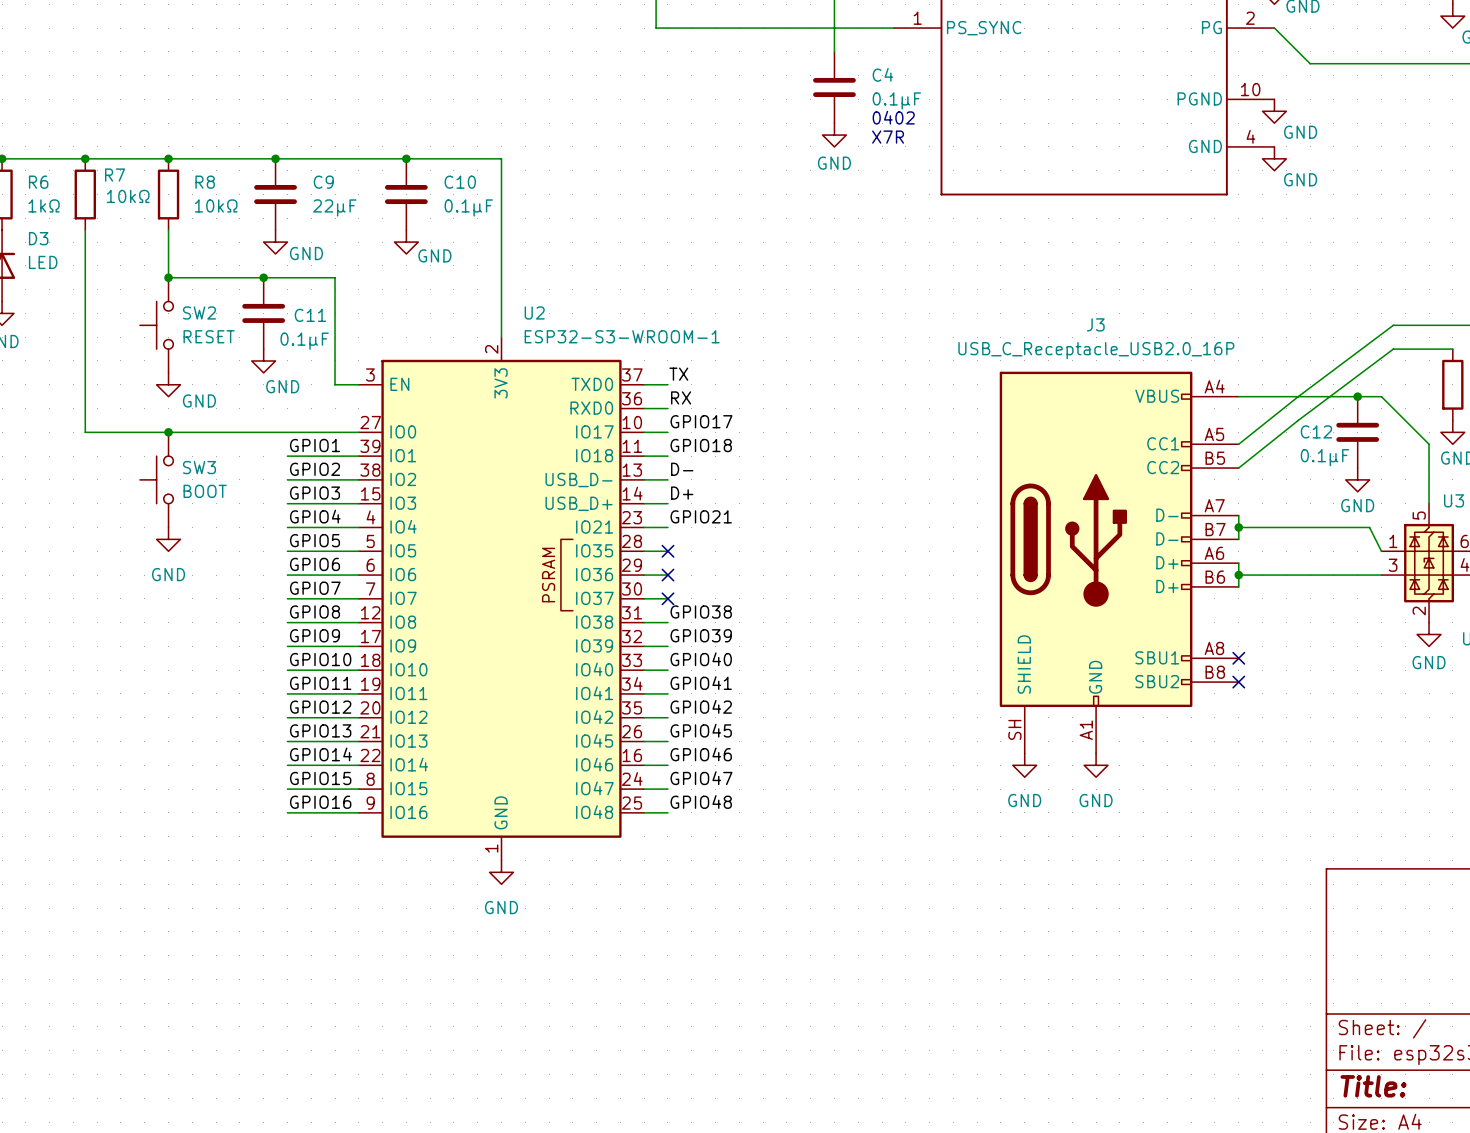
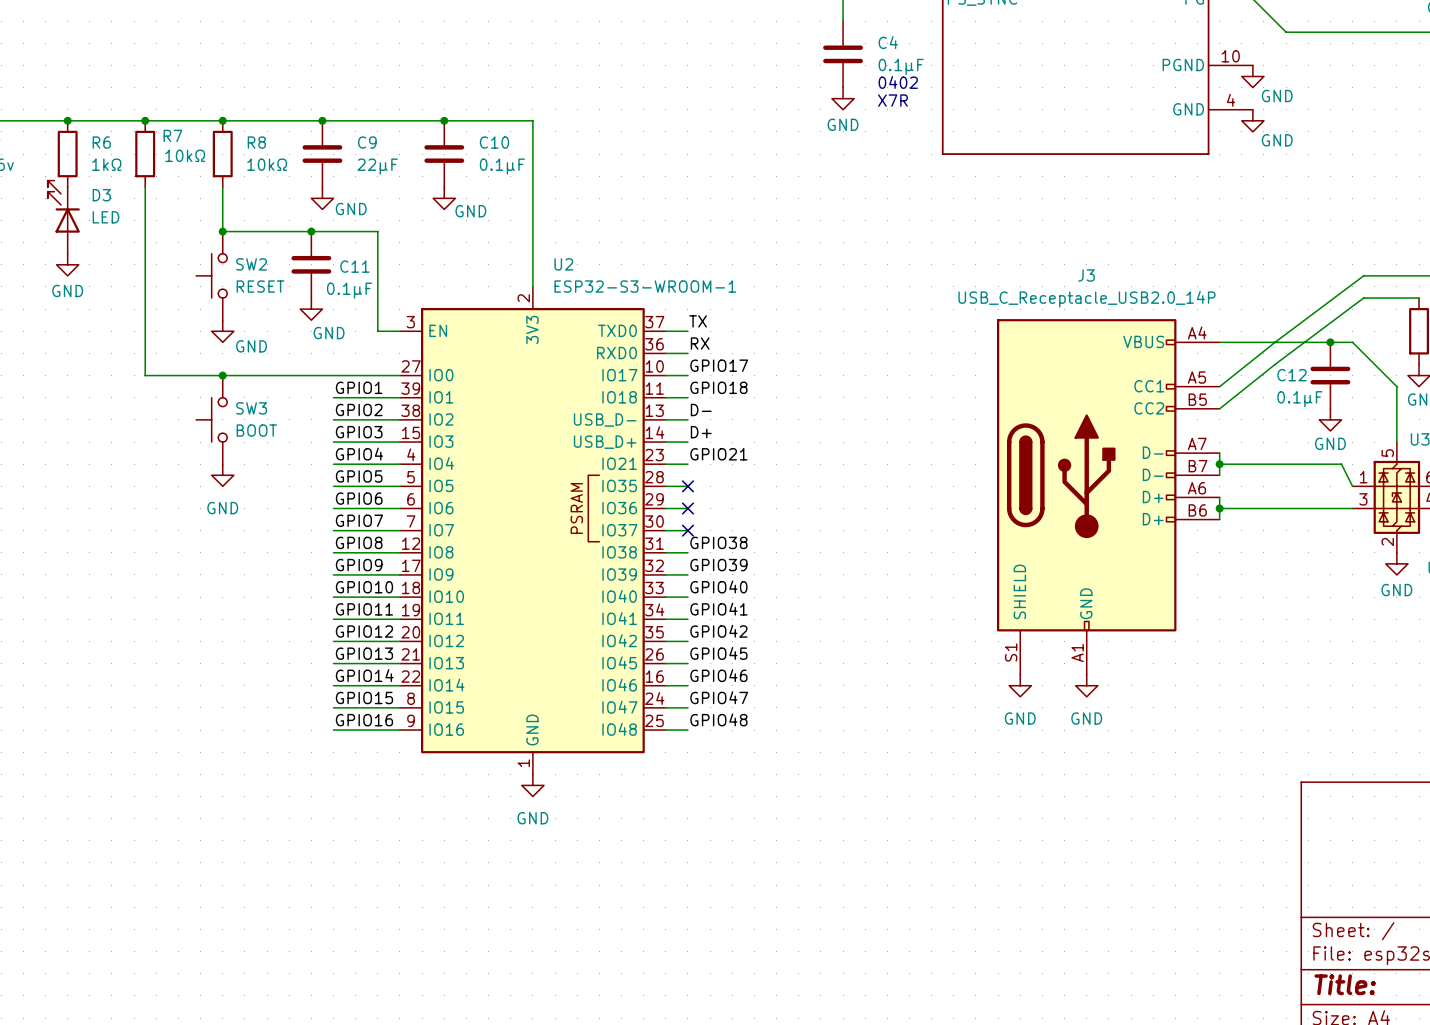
J3 value: USB_C_Receptacle_USB2.0_16P (1096, 350) -> USB_C_Receptacle_USB2.0_14P (1086, 299)
J3 symbol: [999, 371, 1239, 754] -> [997, 319, 1220, 675]
no-connect mark: (1238, 658) -> none
no-connect mark: (1238, 682) -> none

